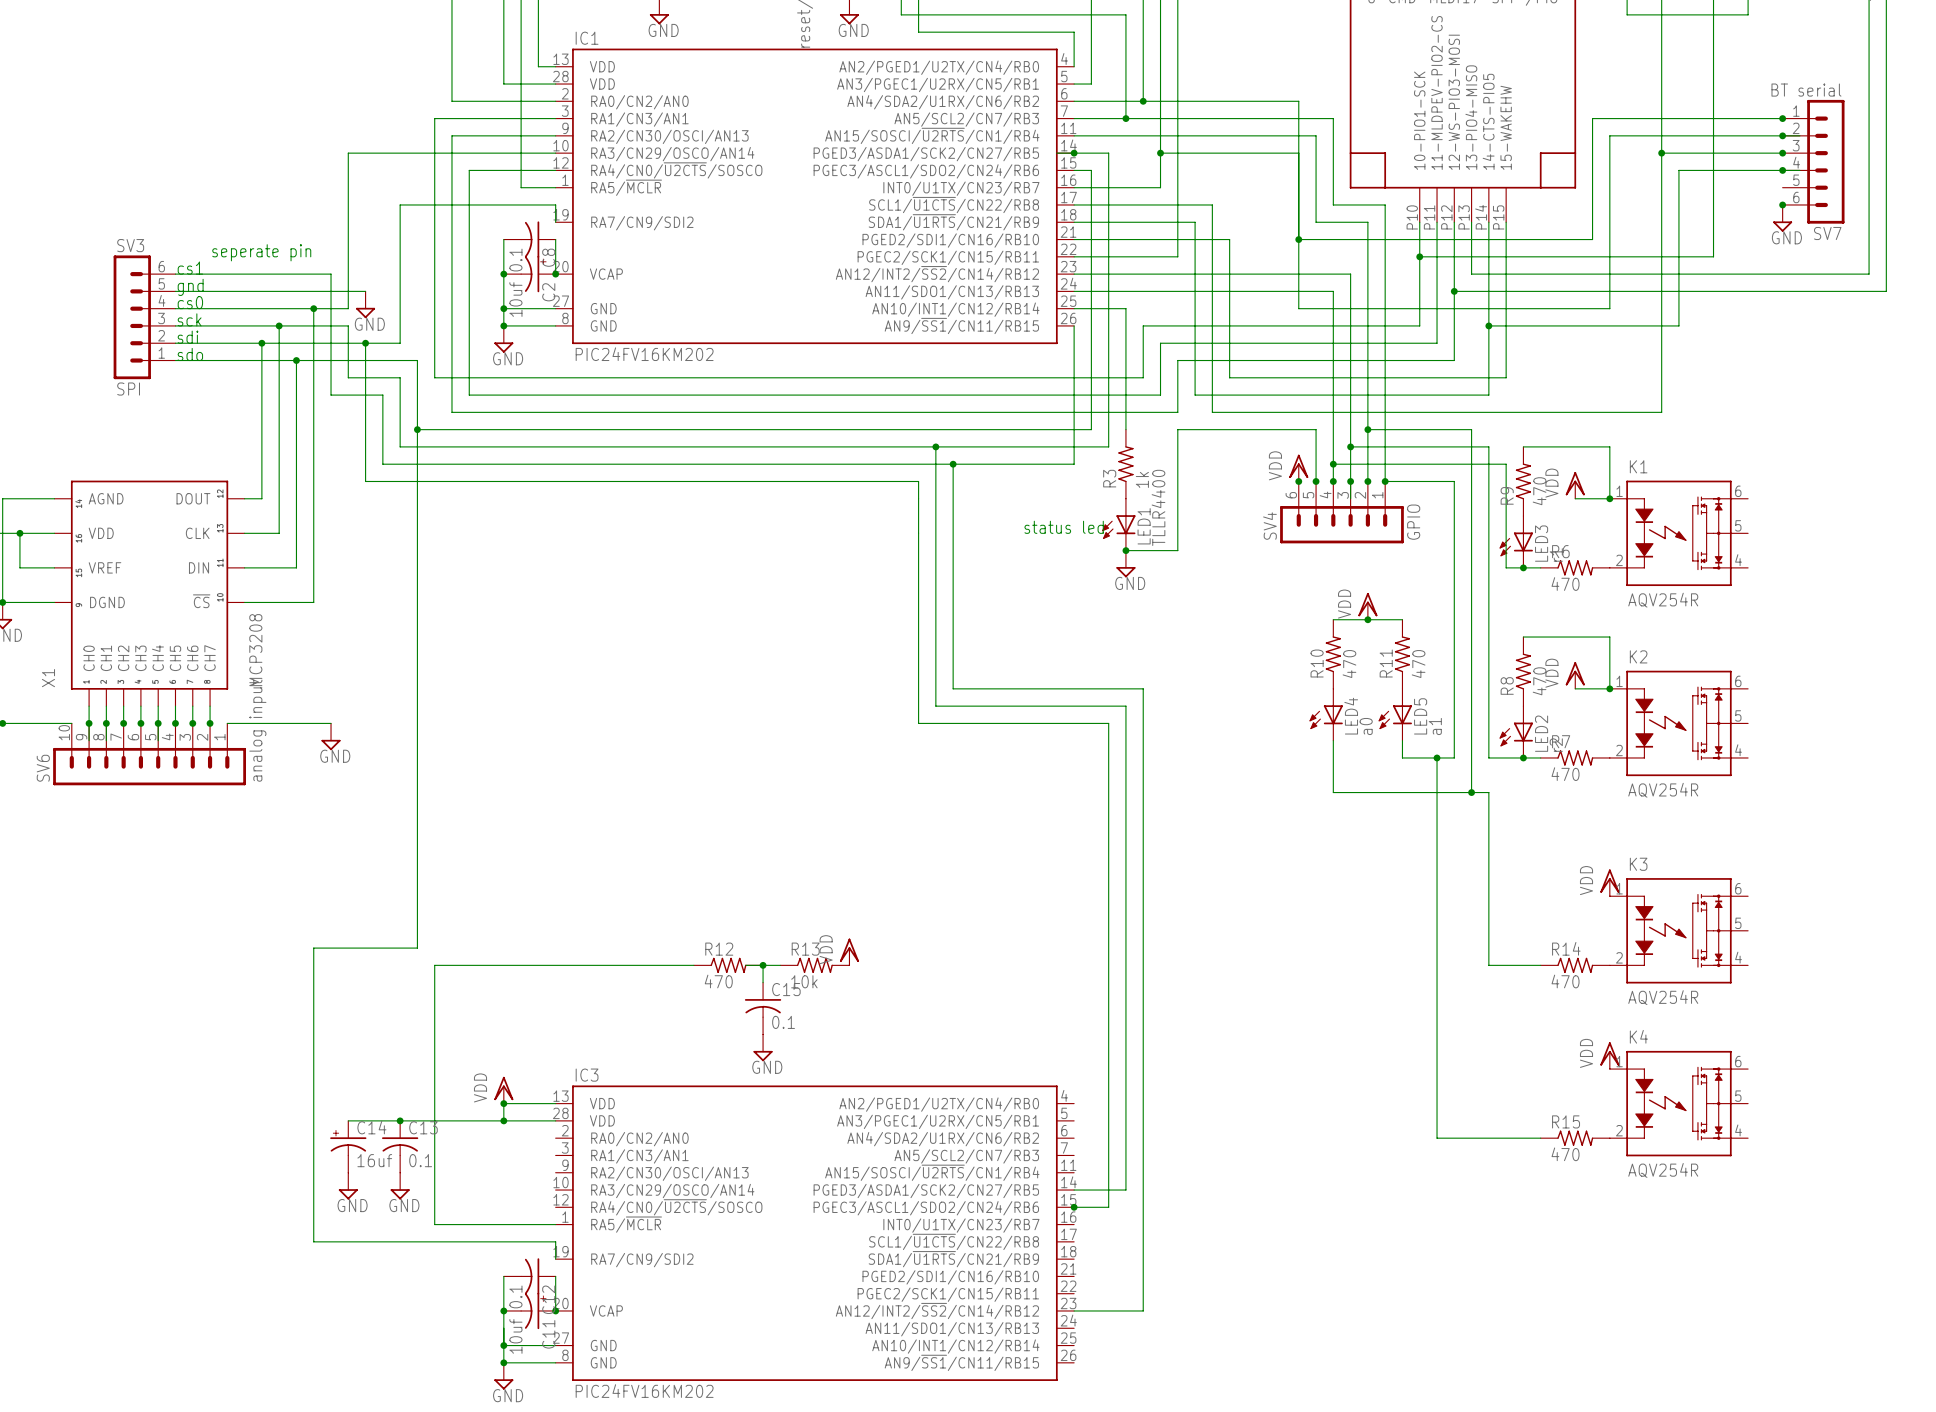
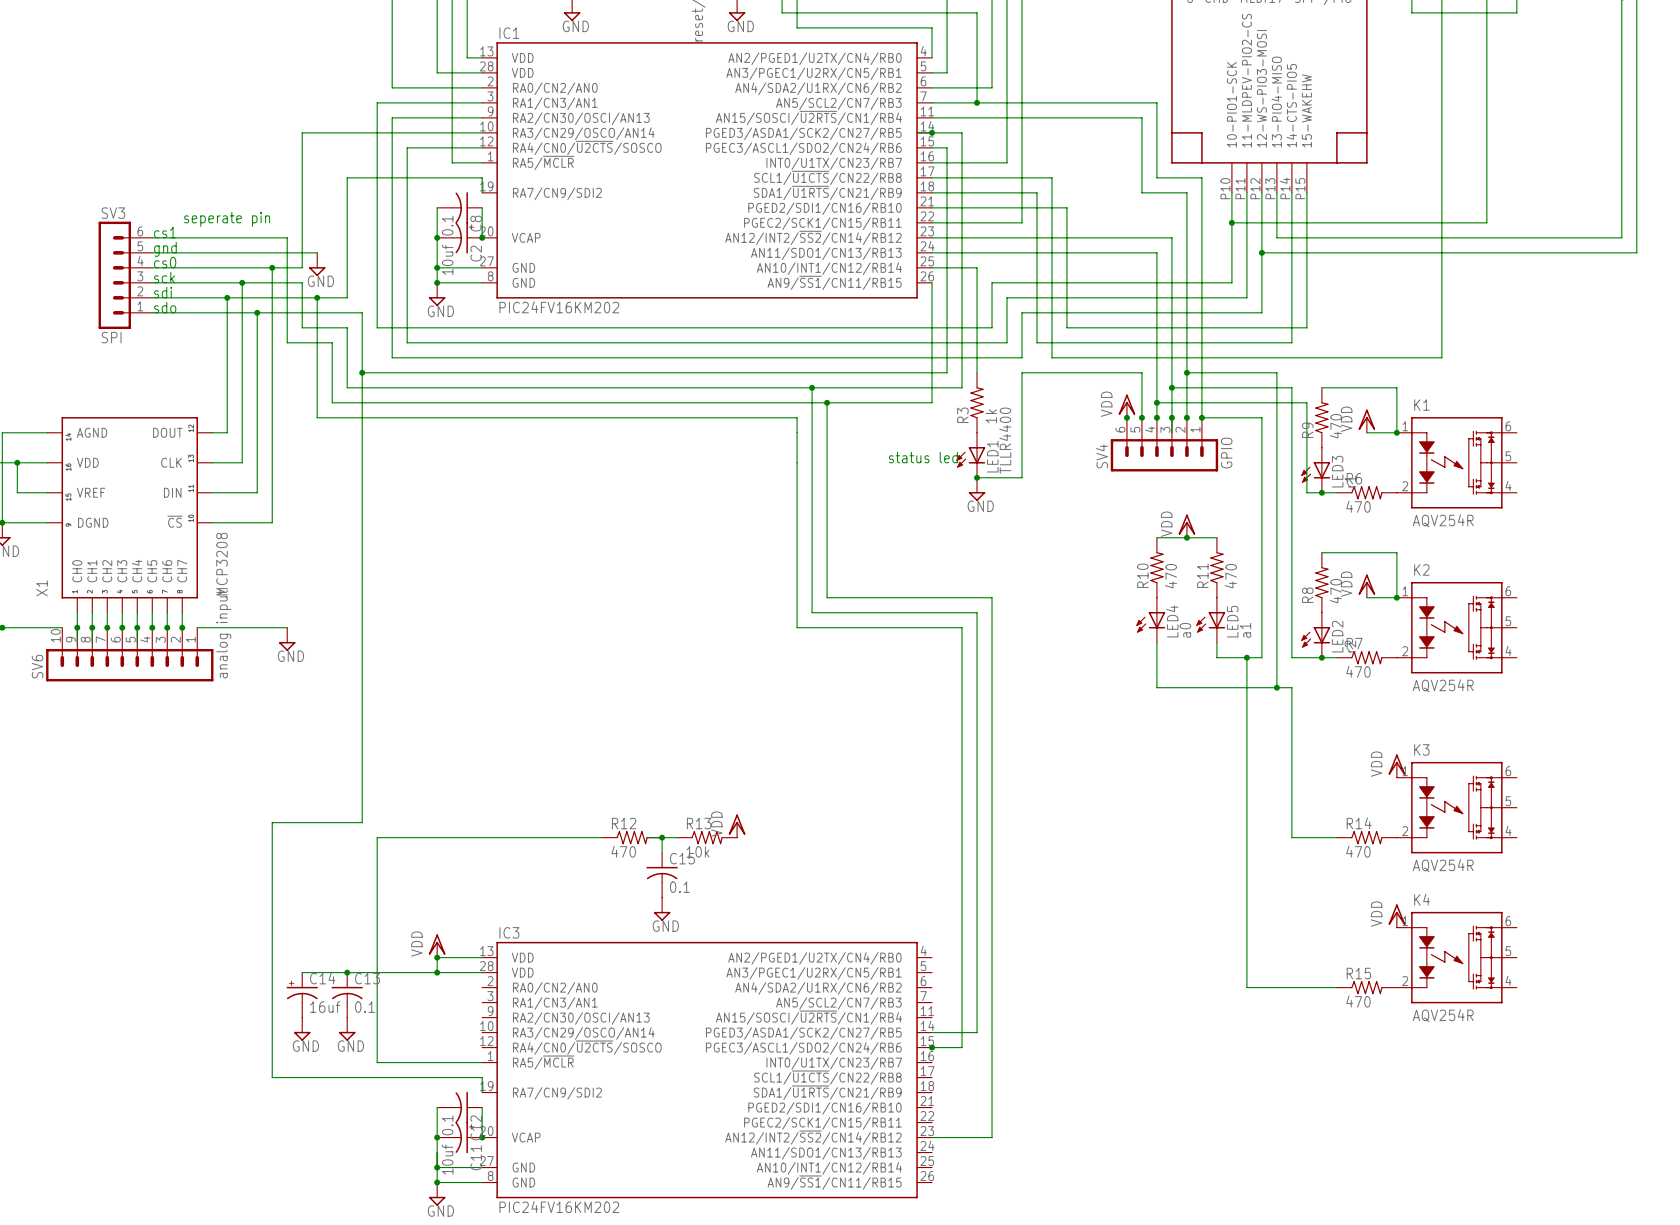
wire: (1143, 101) (1298, 101) (1298, 308) (1609, 308) (1609, 135) (1799, 135) -> none
junction: (1143, 101) -> none
wire: (1782, 118) (1592, 118) (1592, 239) (1298, 239) -> none
junction: (1782, 118) -> none
junction: (1782, 135) -> none
wire: (1160, 153) (1298, 153) -> none
junction: (1160, 153) -> none
wire: (1661, 153) (1782, 153) -> none
junction: (1661, 153) -> none
junction: (1782, 153) -> none
SV7: BT serial (1813, 161) -> none
junction: (1782, 170) -> none
wire: (1799, 170) (1678, 170) (1678, 325) (1488, 325) -> none
junction: (1782, 204) -> none
power symbol: GND (1782, 218) -> none
junction: (1298, 239) -> none
junction: (1488, 325) -> none

